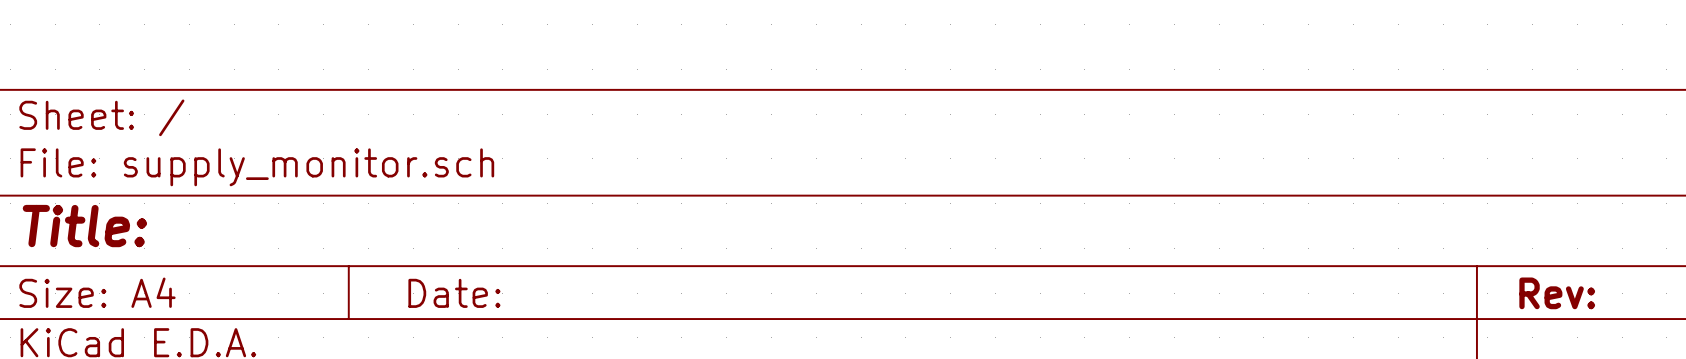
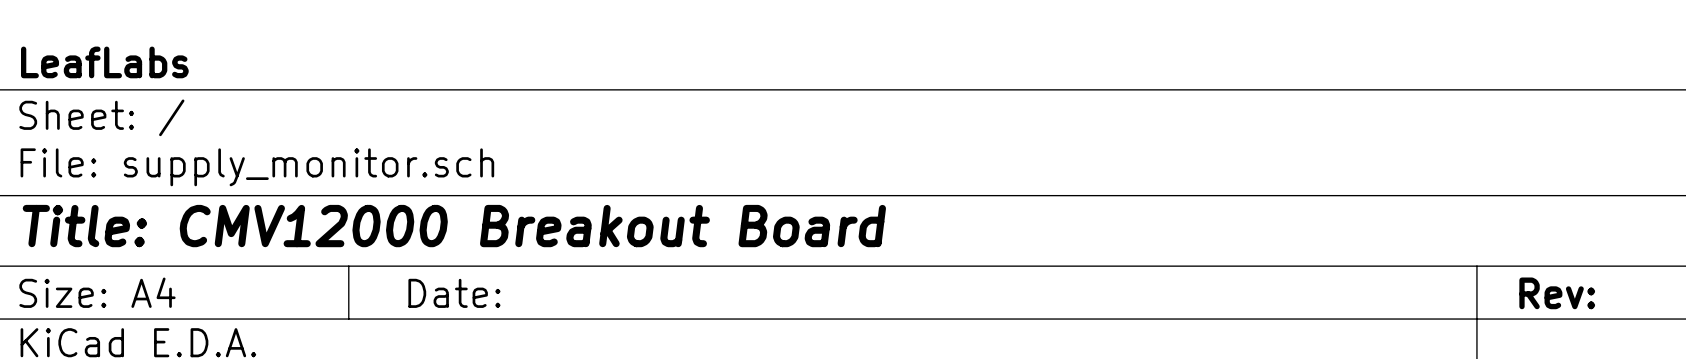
title block: none -> LeafLabs (104, 62)
title block: Title: (84, 226) -> Title: CMV12000 Breakout Board (454, 226)

